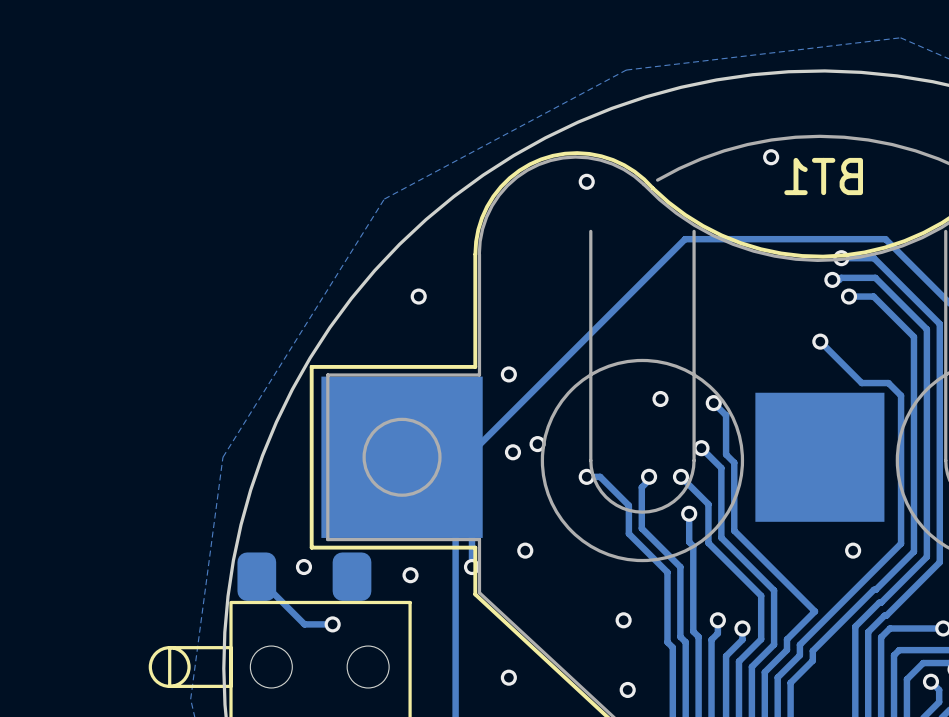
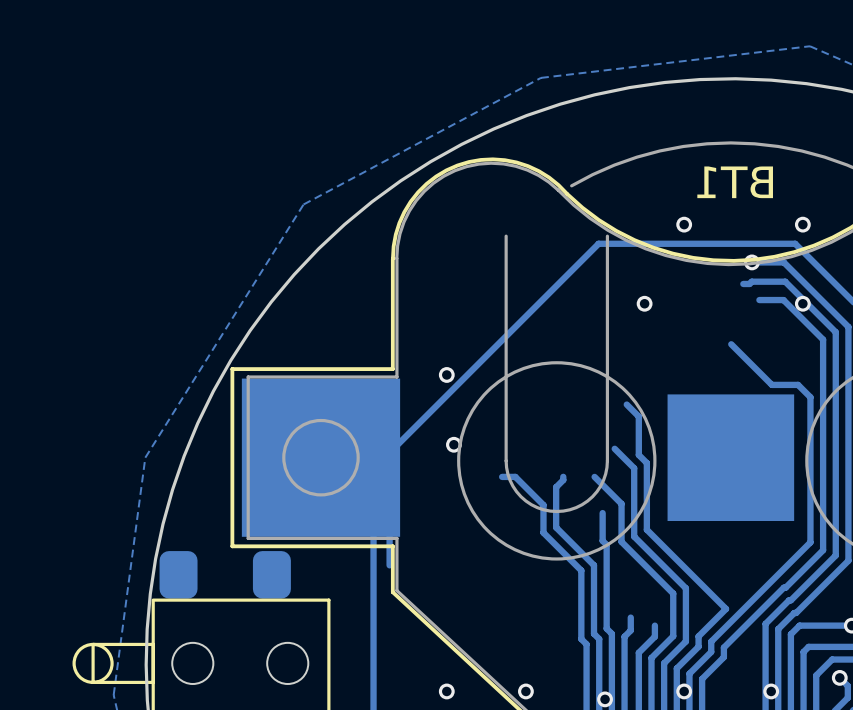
via: (771, 157) -> none
via: (586, 181) -> none
via: none -> (684, 224)
via: none -> (802, 224)
via: (832, 279) -> none
via: (418, 296) -> none
via: (849, 296) -> none
via: none -> (644, 303)
via: none -> (802, 303)
via: (820, 341) -> none
via position: (508, 374) -> (446, 374)
via: (660, 399) -> none
via: (713, 403) -> none
via: (701, 448) -> none
via: (512, 452) -> none
via: (586, 476) -> none
via: (649, 476) -> none
via: (680, 476) -> none
via: (689, 513) -> none
via: (525, 550) -> none
via: (853, 550) -> none
via: (303, 567) -> none
via: (471, 567) -> none
via: (410, 575) -> none
track: (256, 576) (304, 624) (332, 624) -> none
via: (623, 620) -> none
via: (717, 620) -> none
via: (332, 624) -> none
via: (742, 628) -> none
via position: (508, 677) -> (446, 691)
via position: (627, 689) -> (525, 691)
via: none -> (684, 691)
via: none -> (771, 691)
via: none -> (605, 699)

